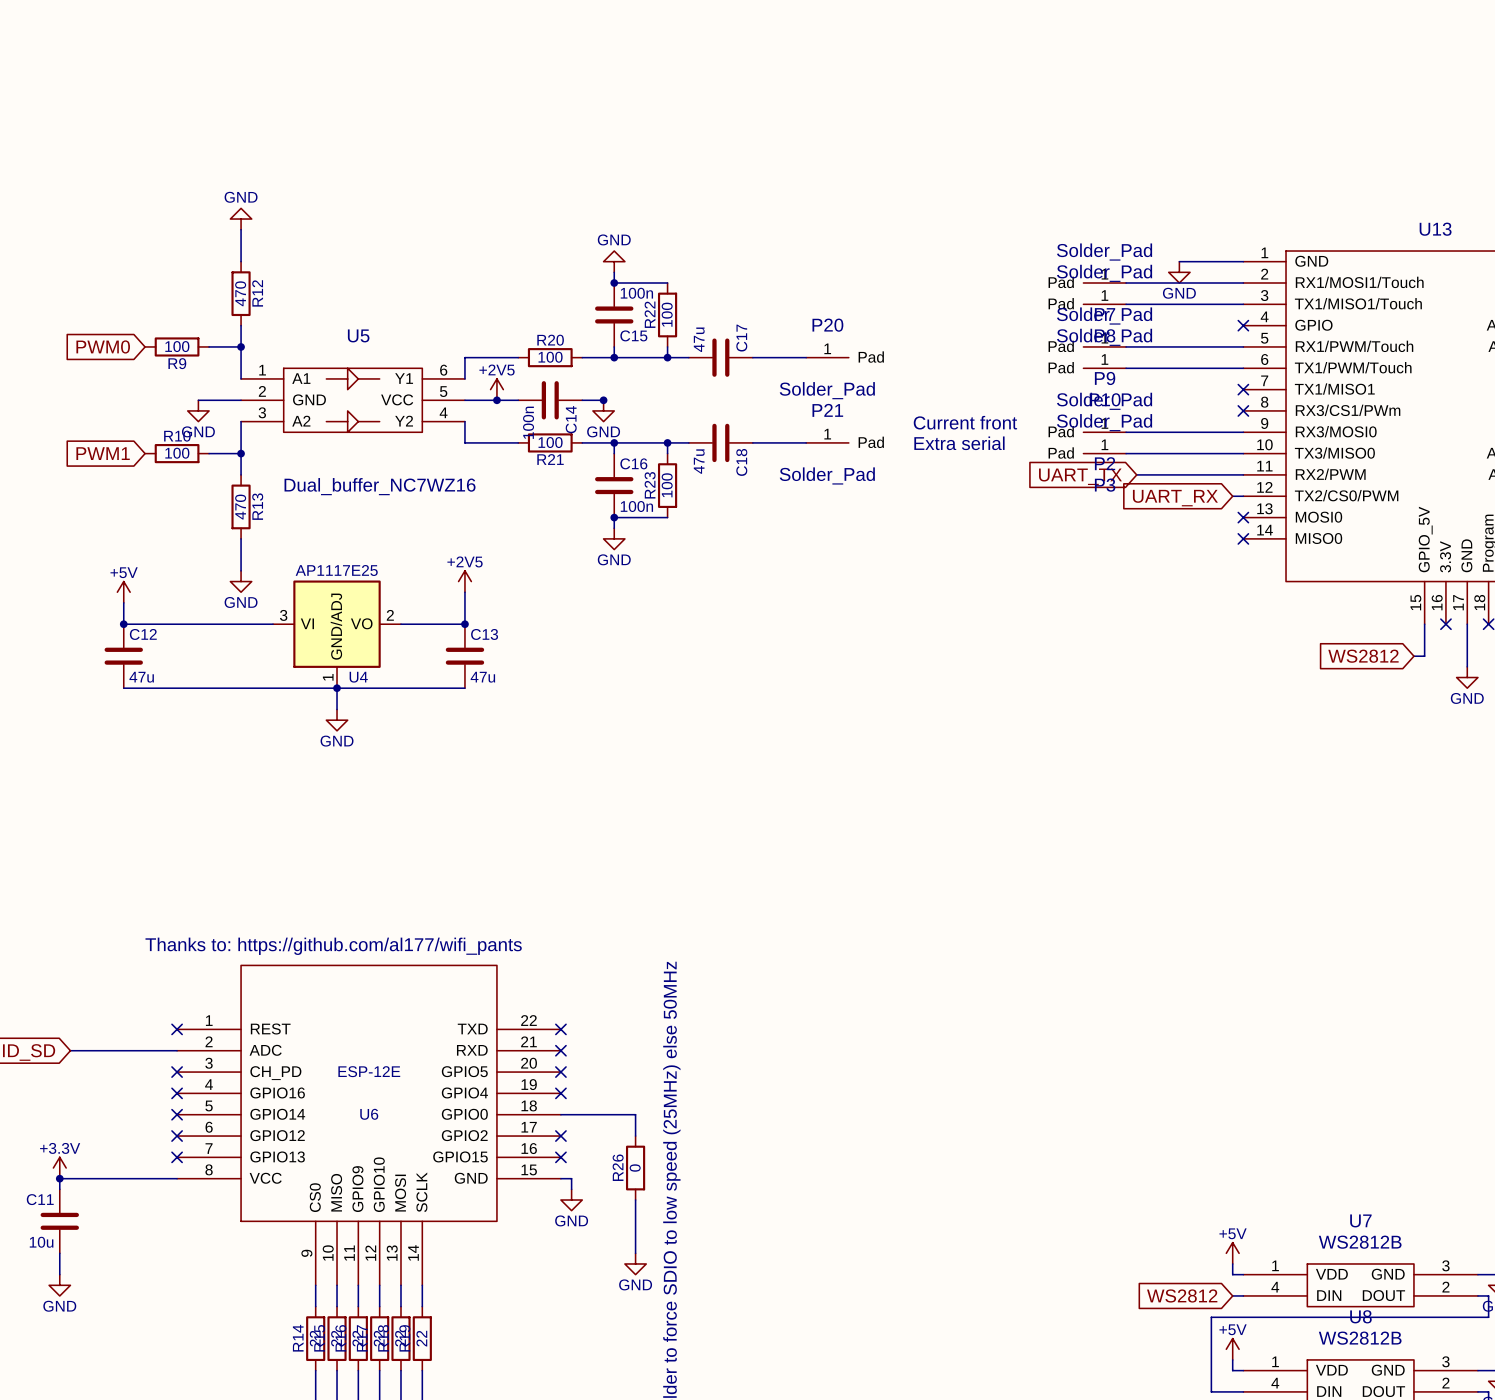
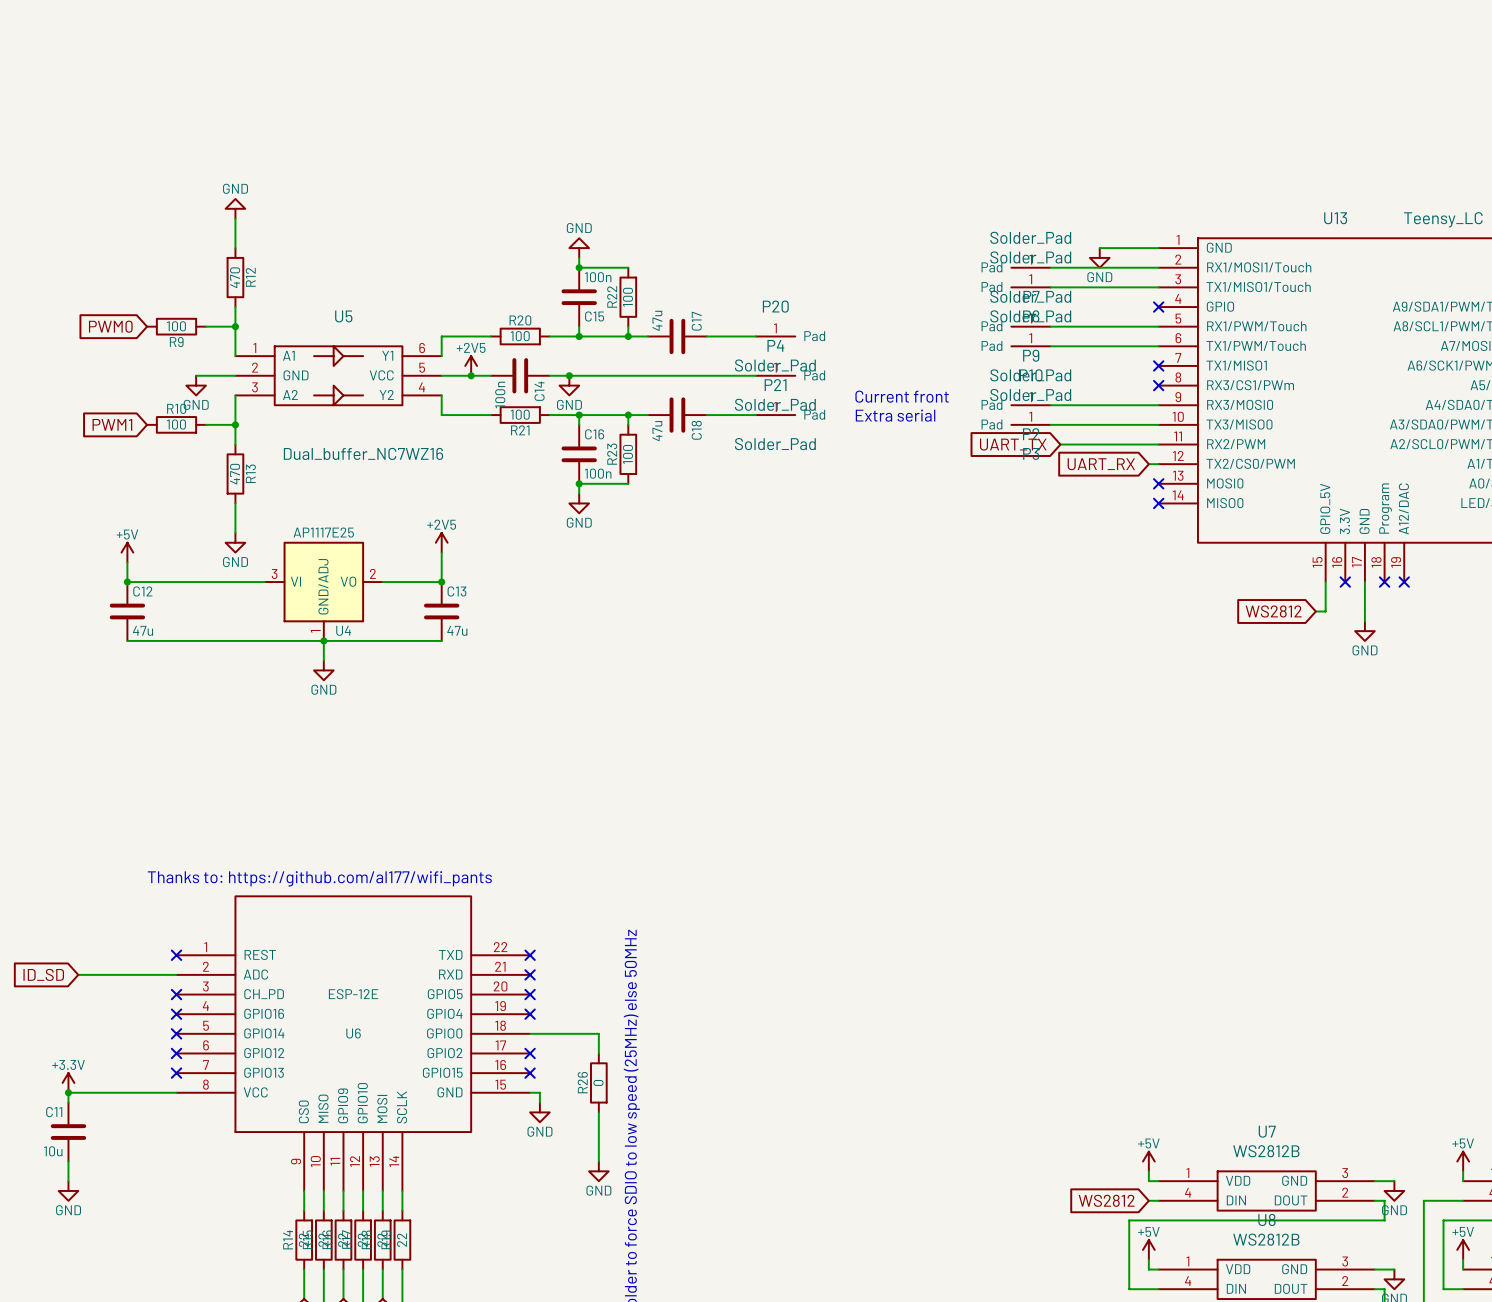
wire: none -> (569, 375) (755, 375)
P4: none -> Solder_Pad (775, 375)

